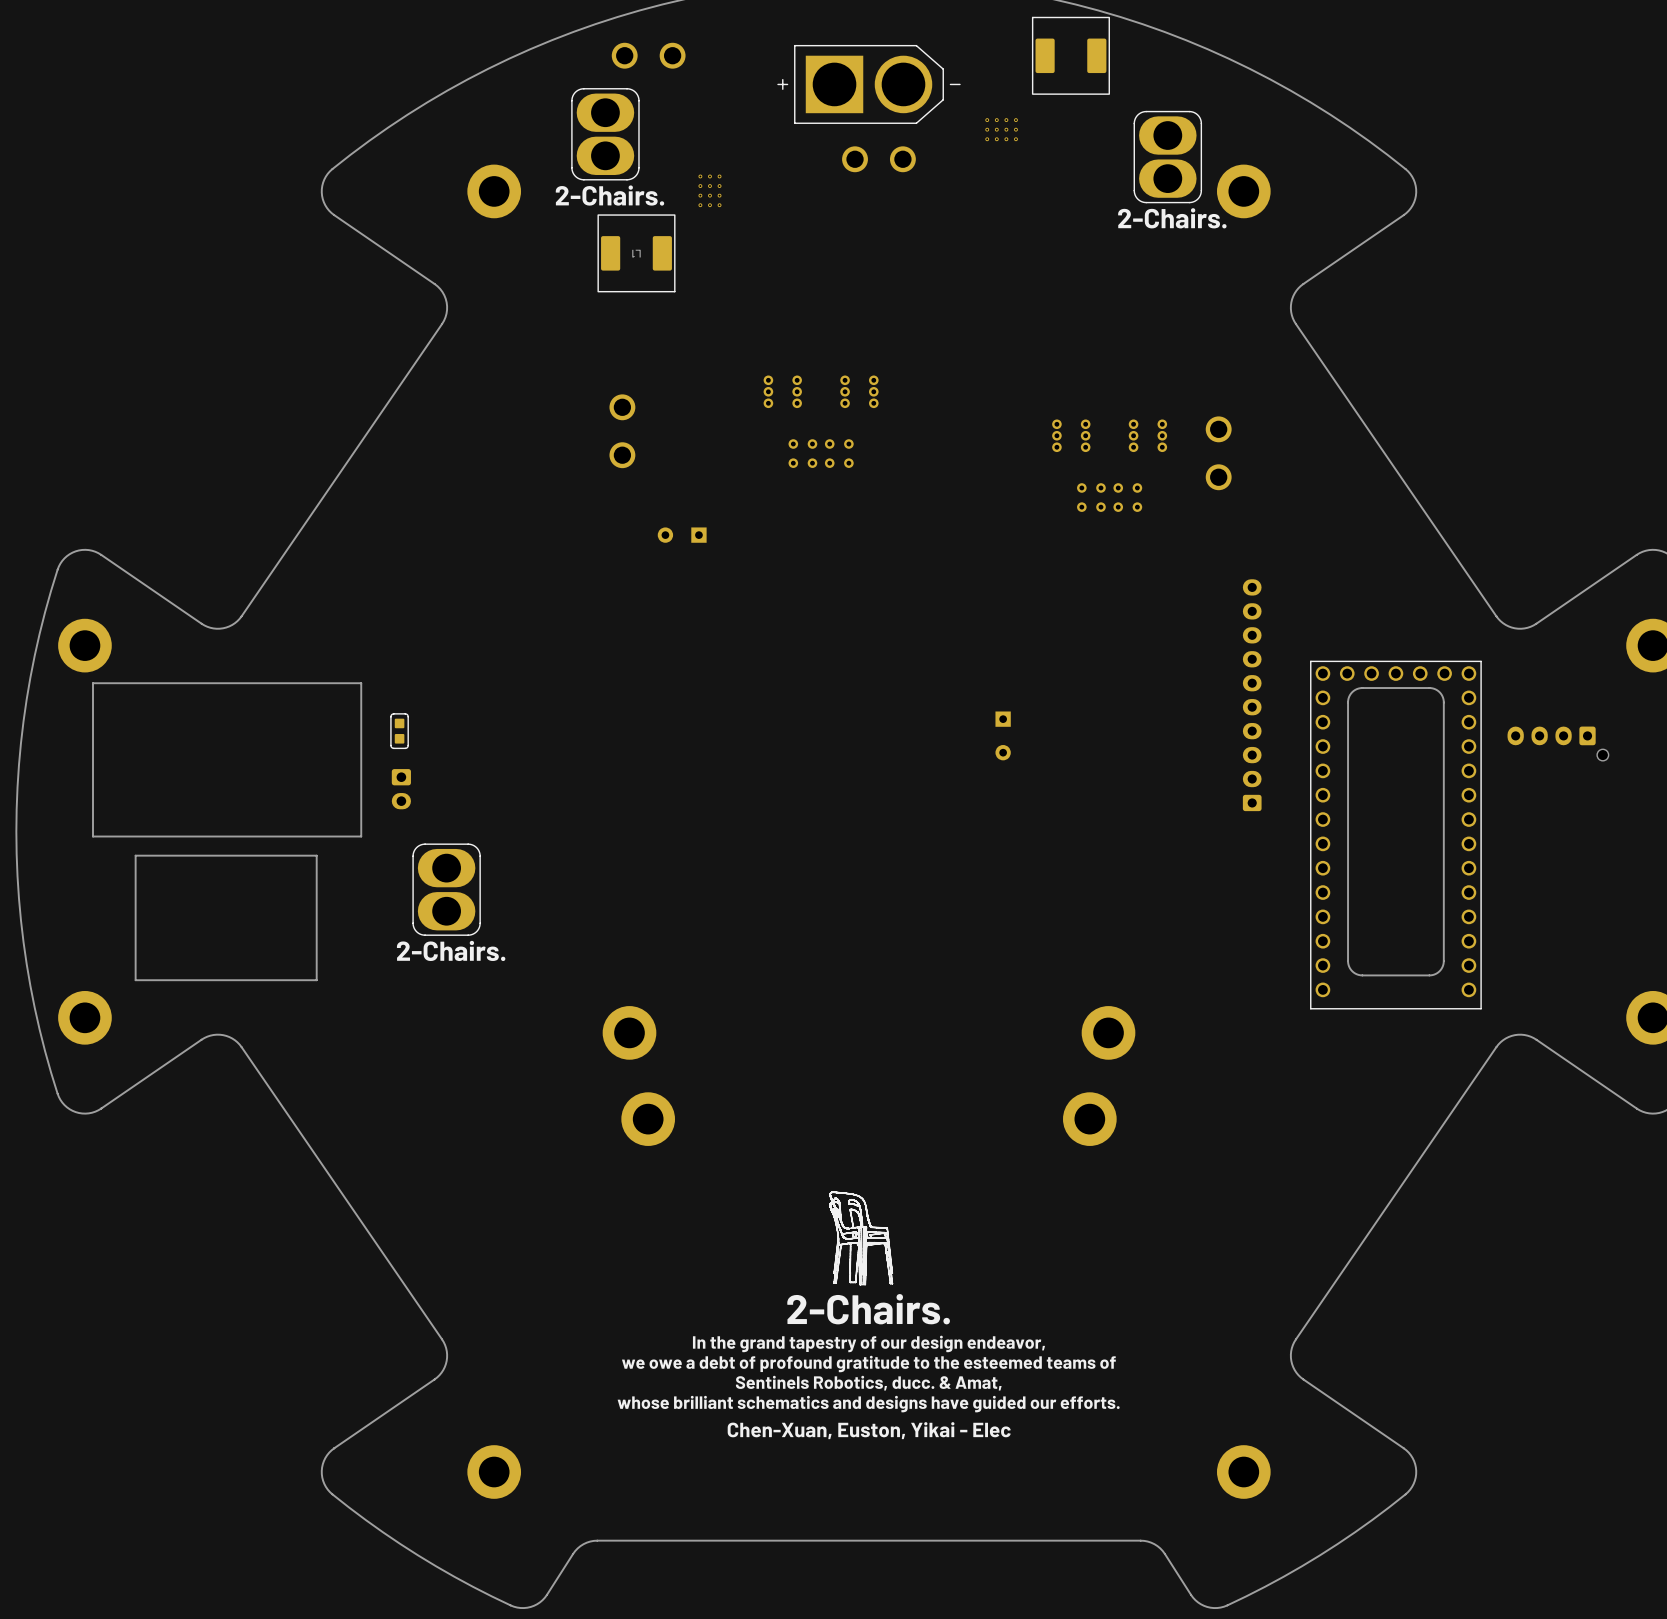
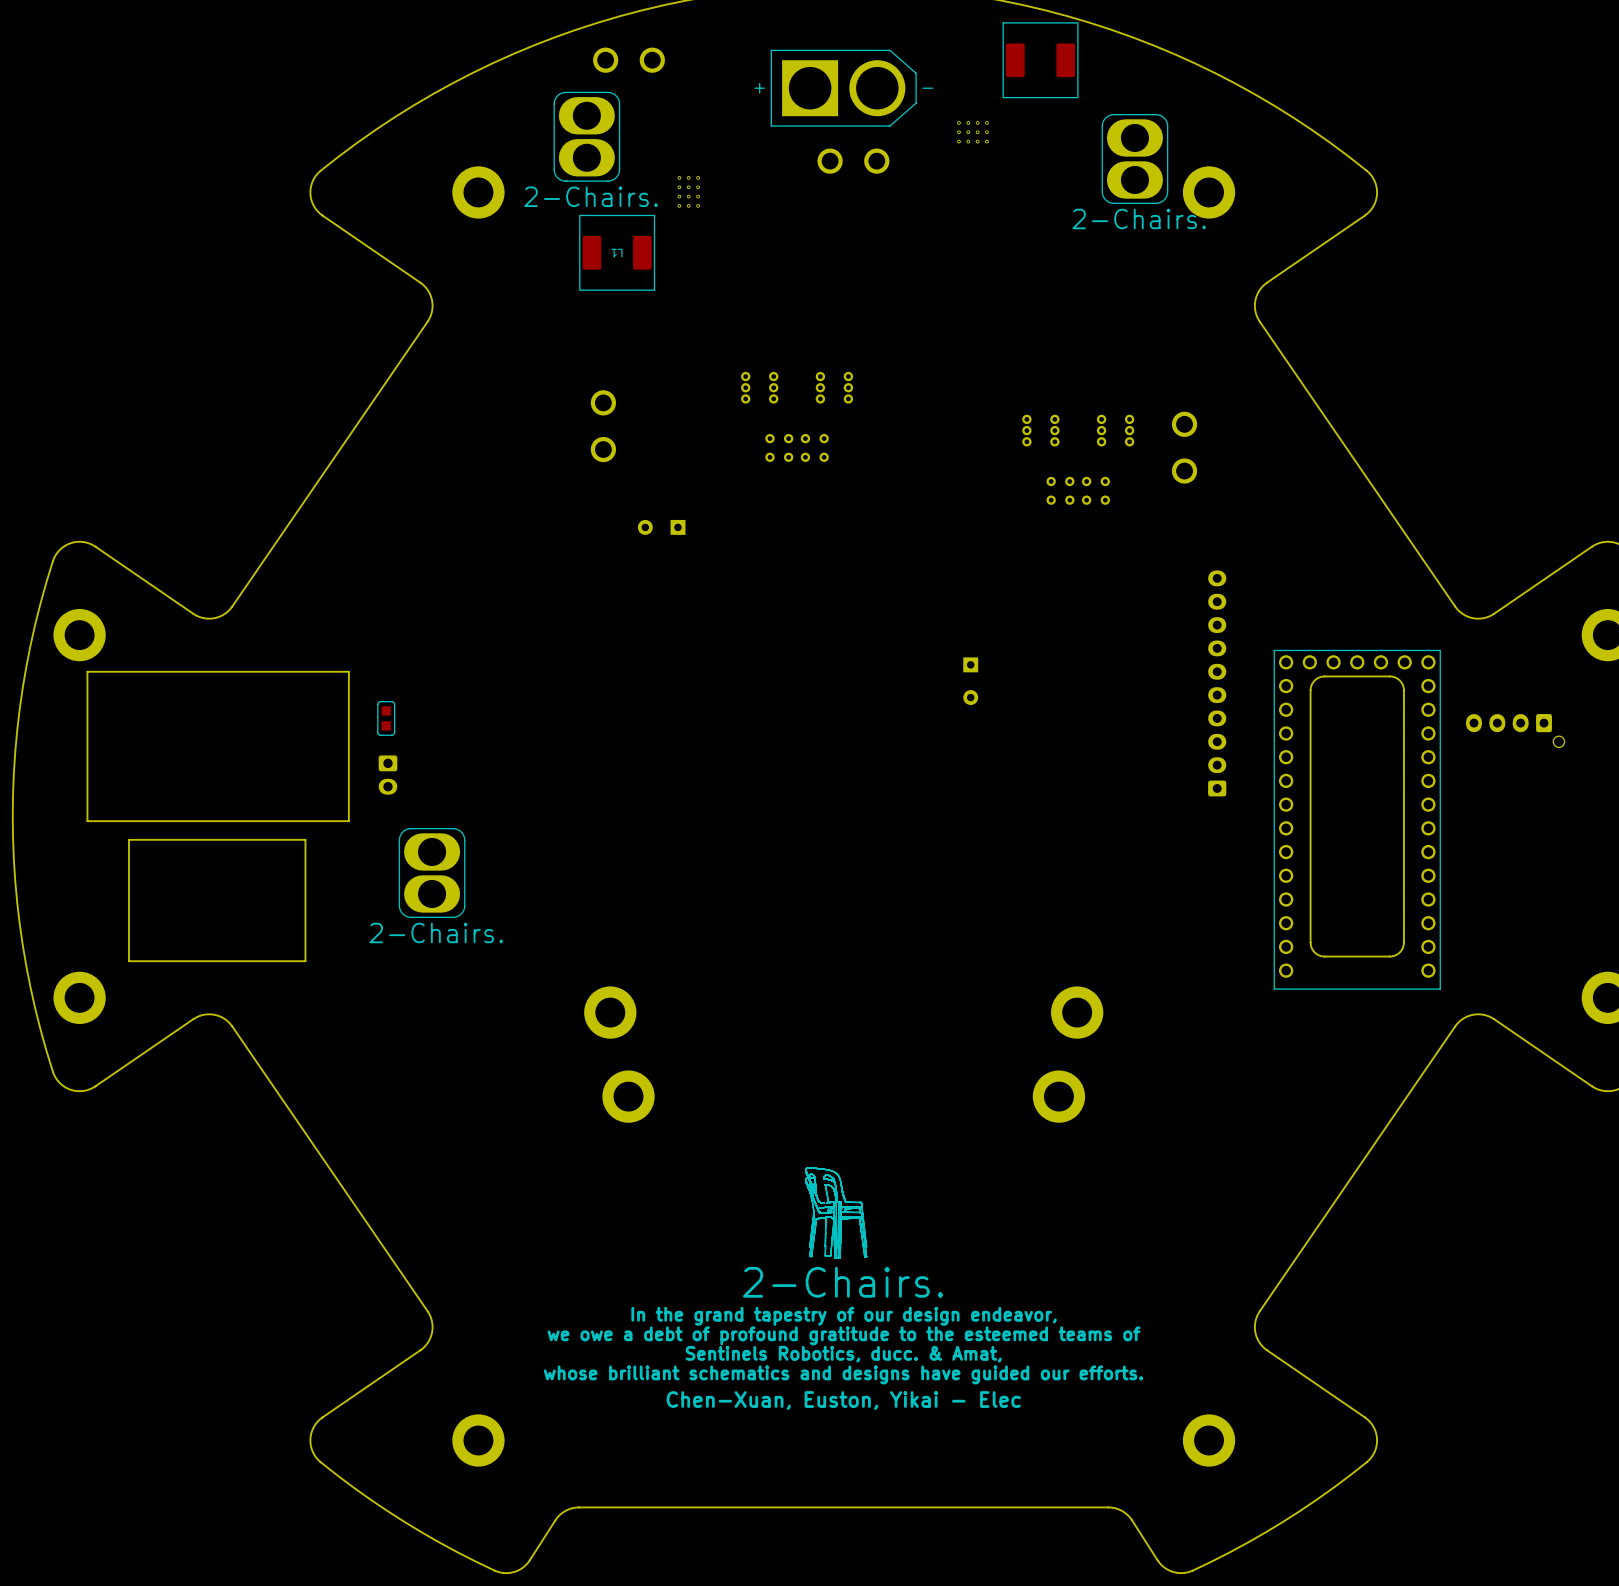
part position: (1003, 735) -> (970, 681)

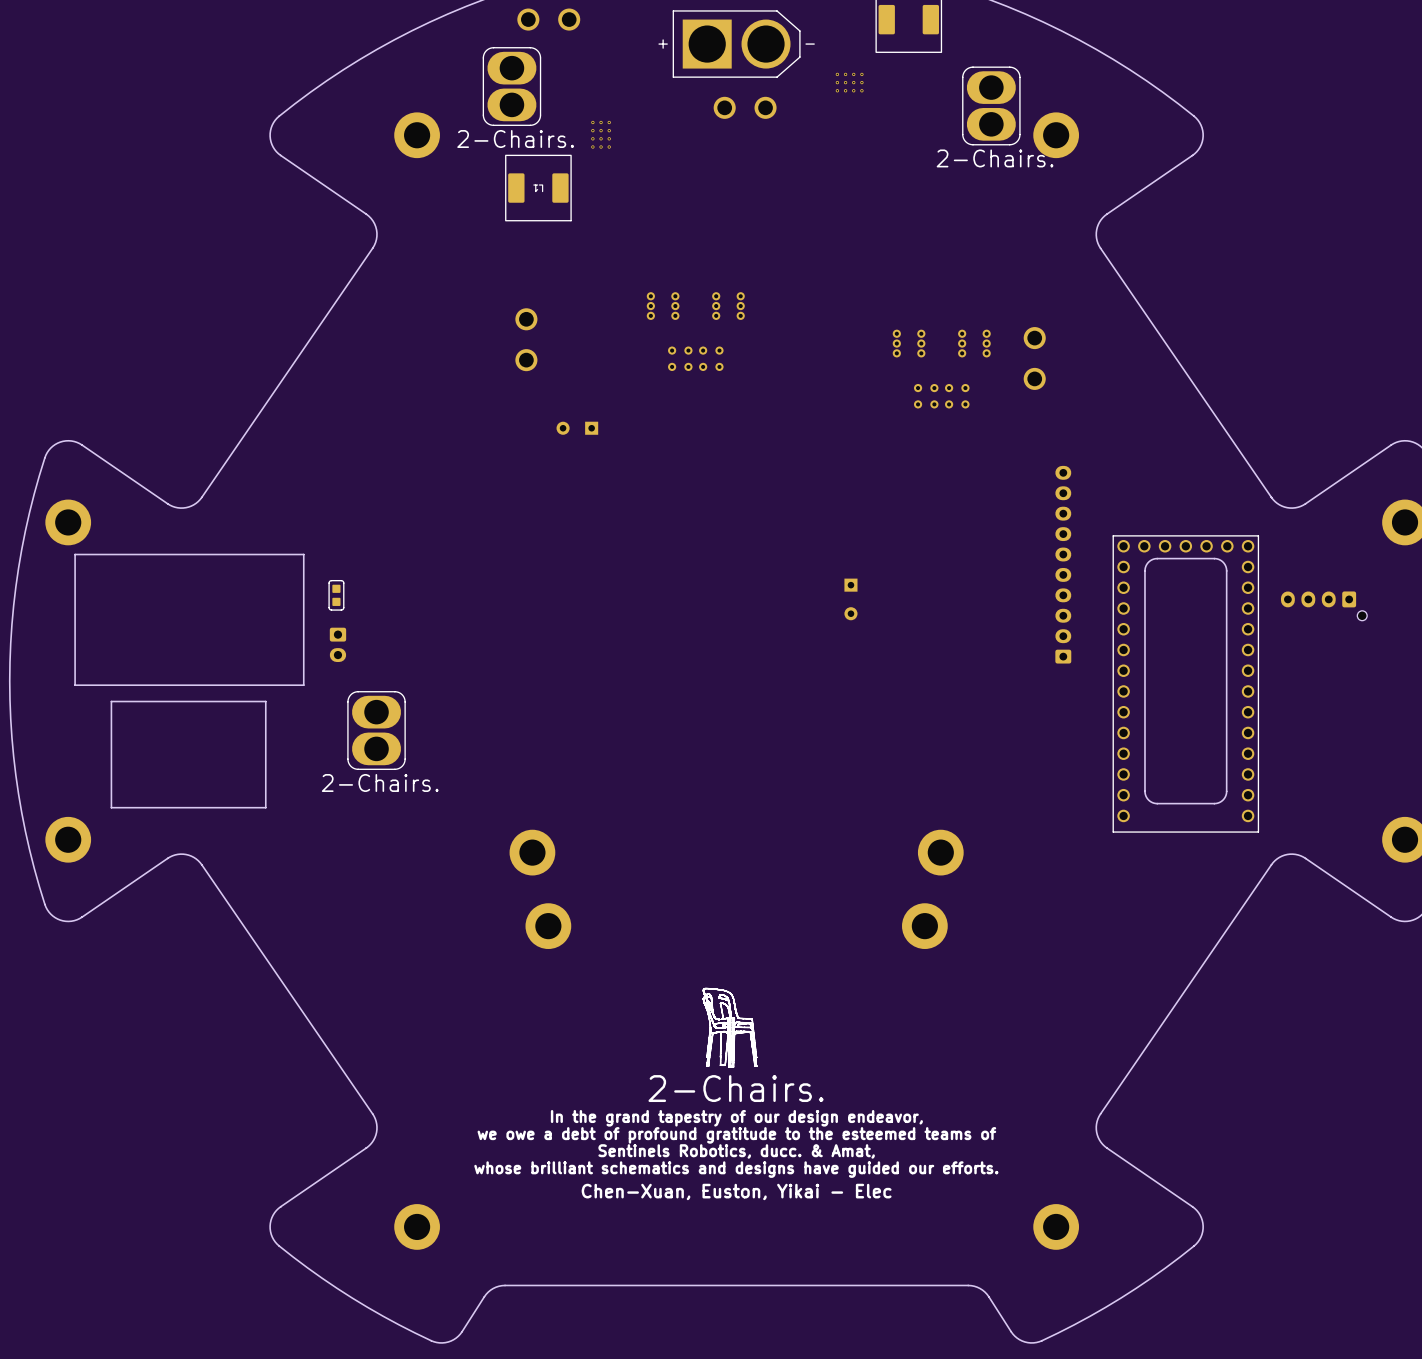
part position: (970, 681) -> (850, 599)

